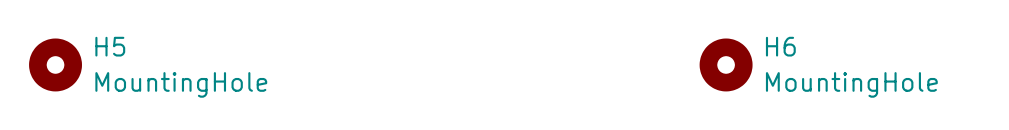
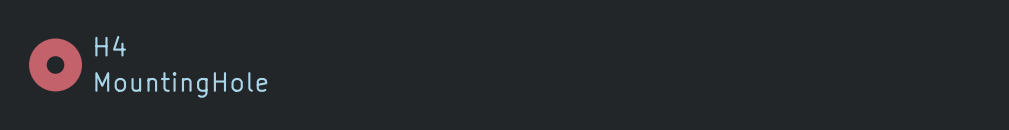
H5 name: H5 (110, 46) -> H4 (110, 46)
H6: MountingHole (726, 64) -> none

